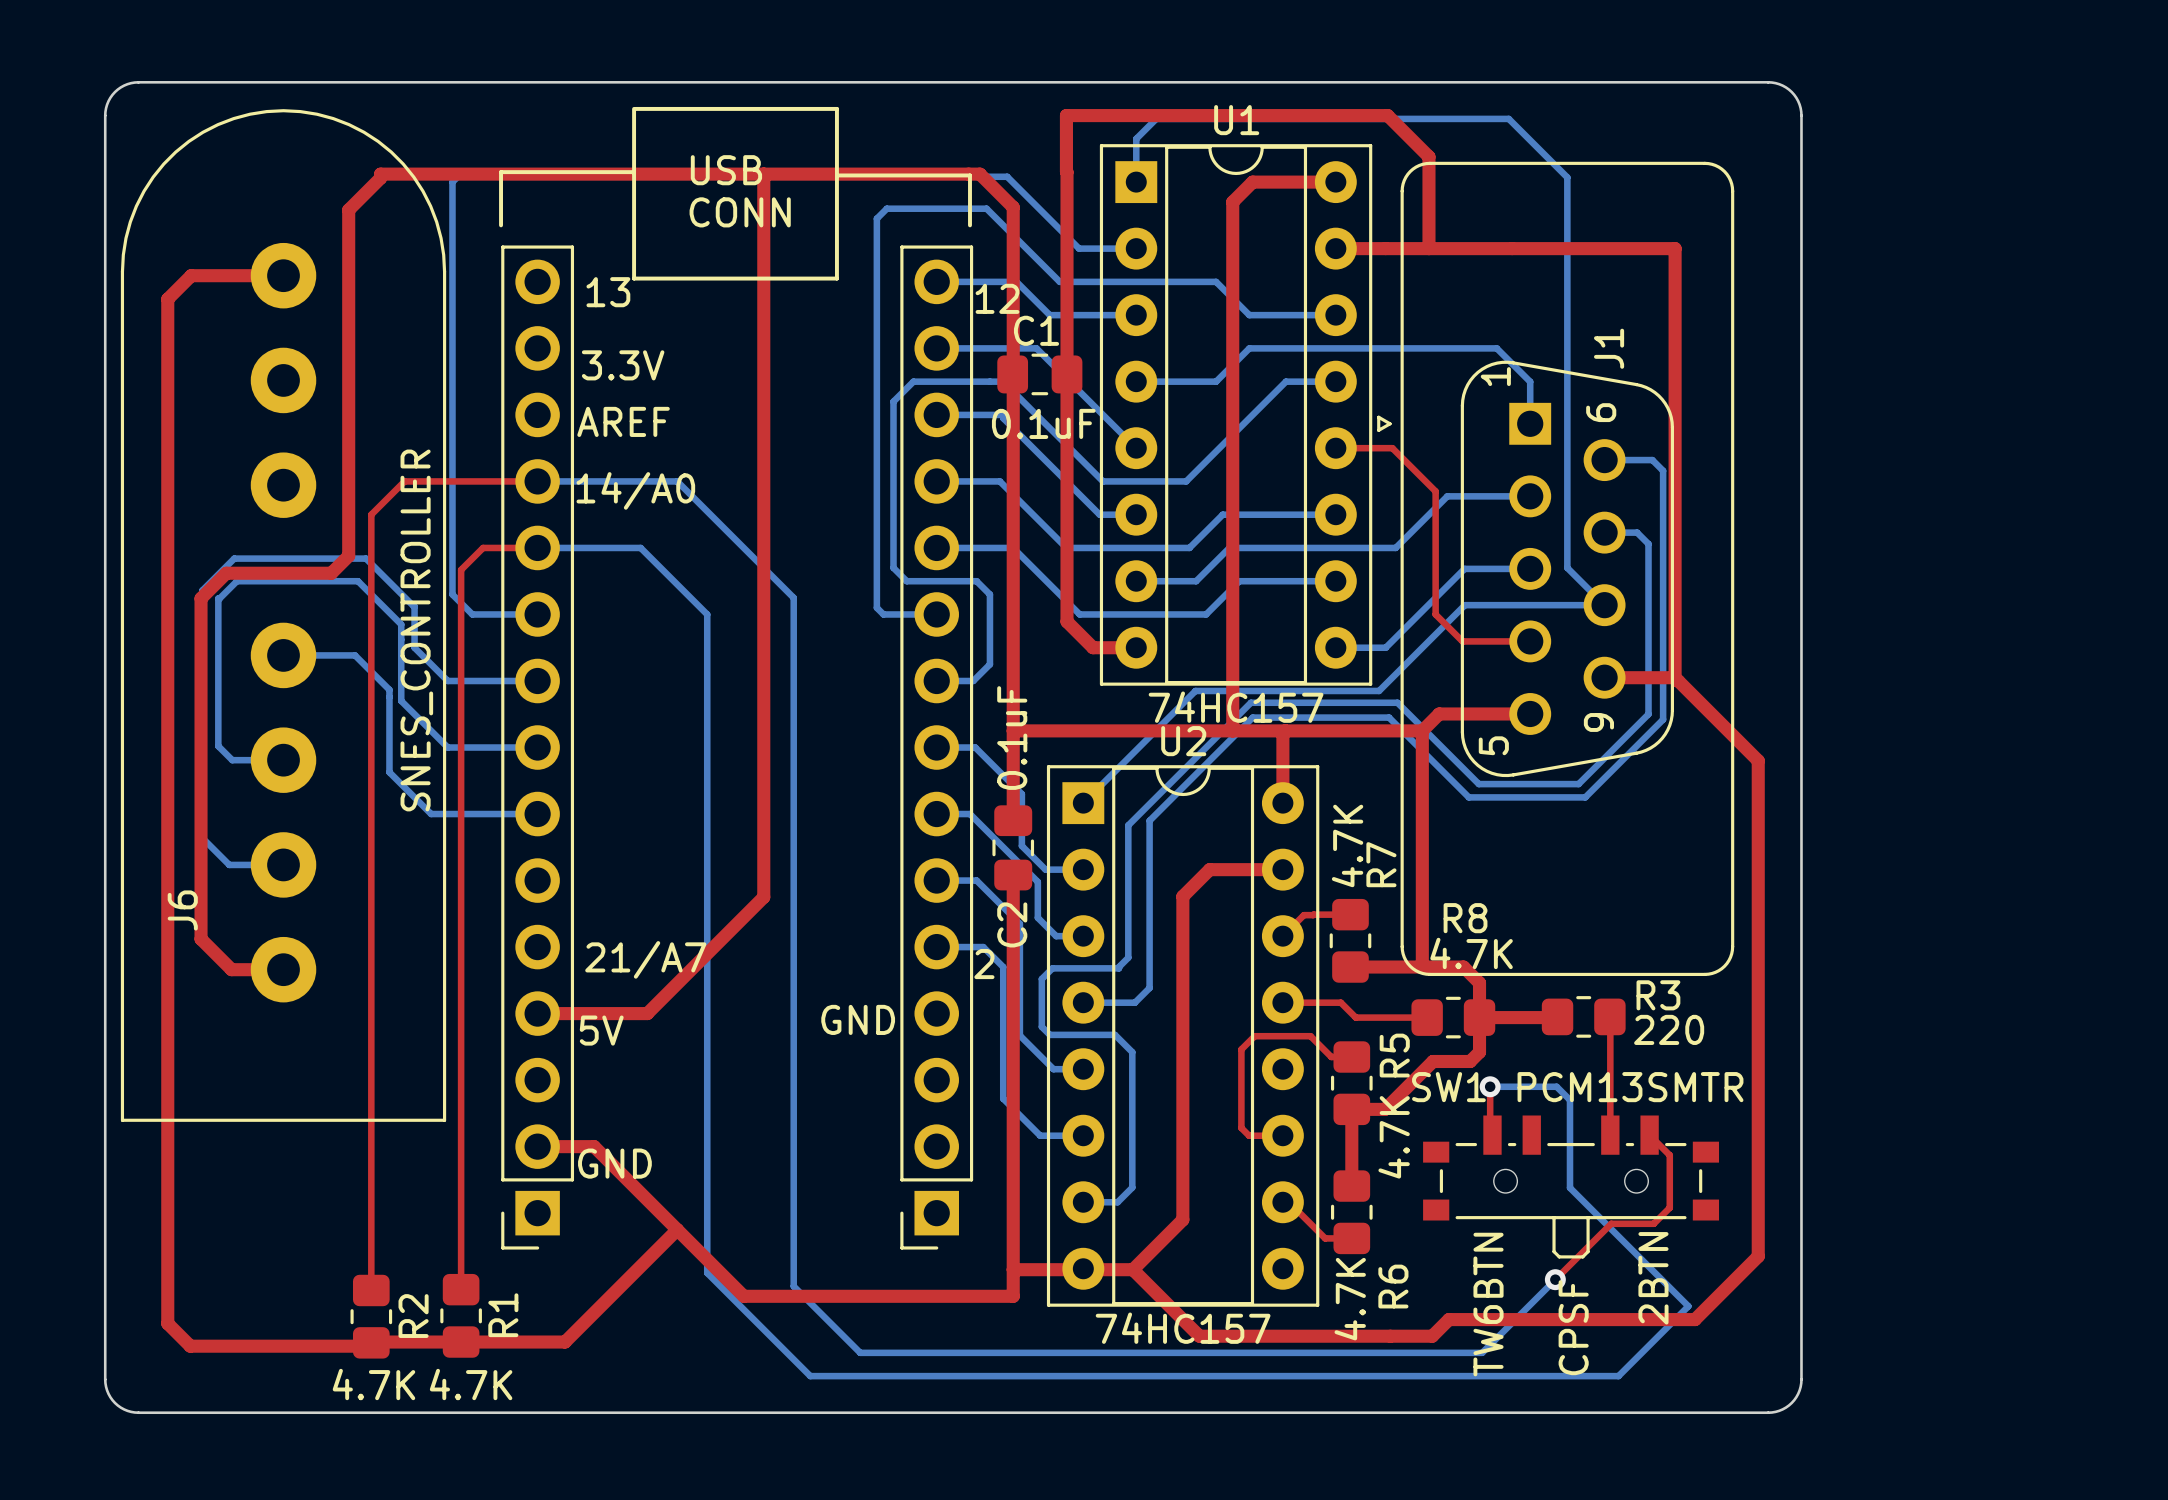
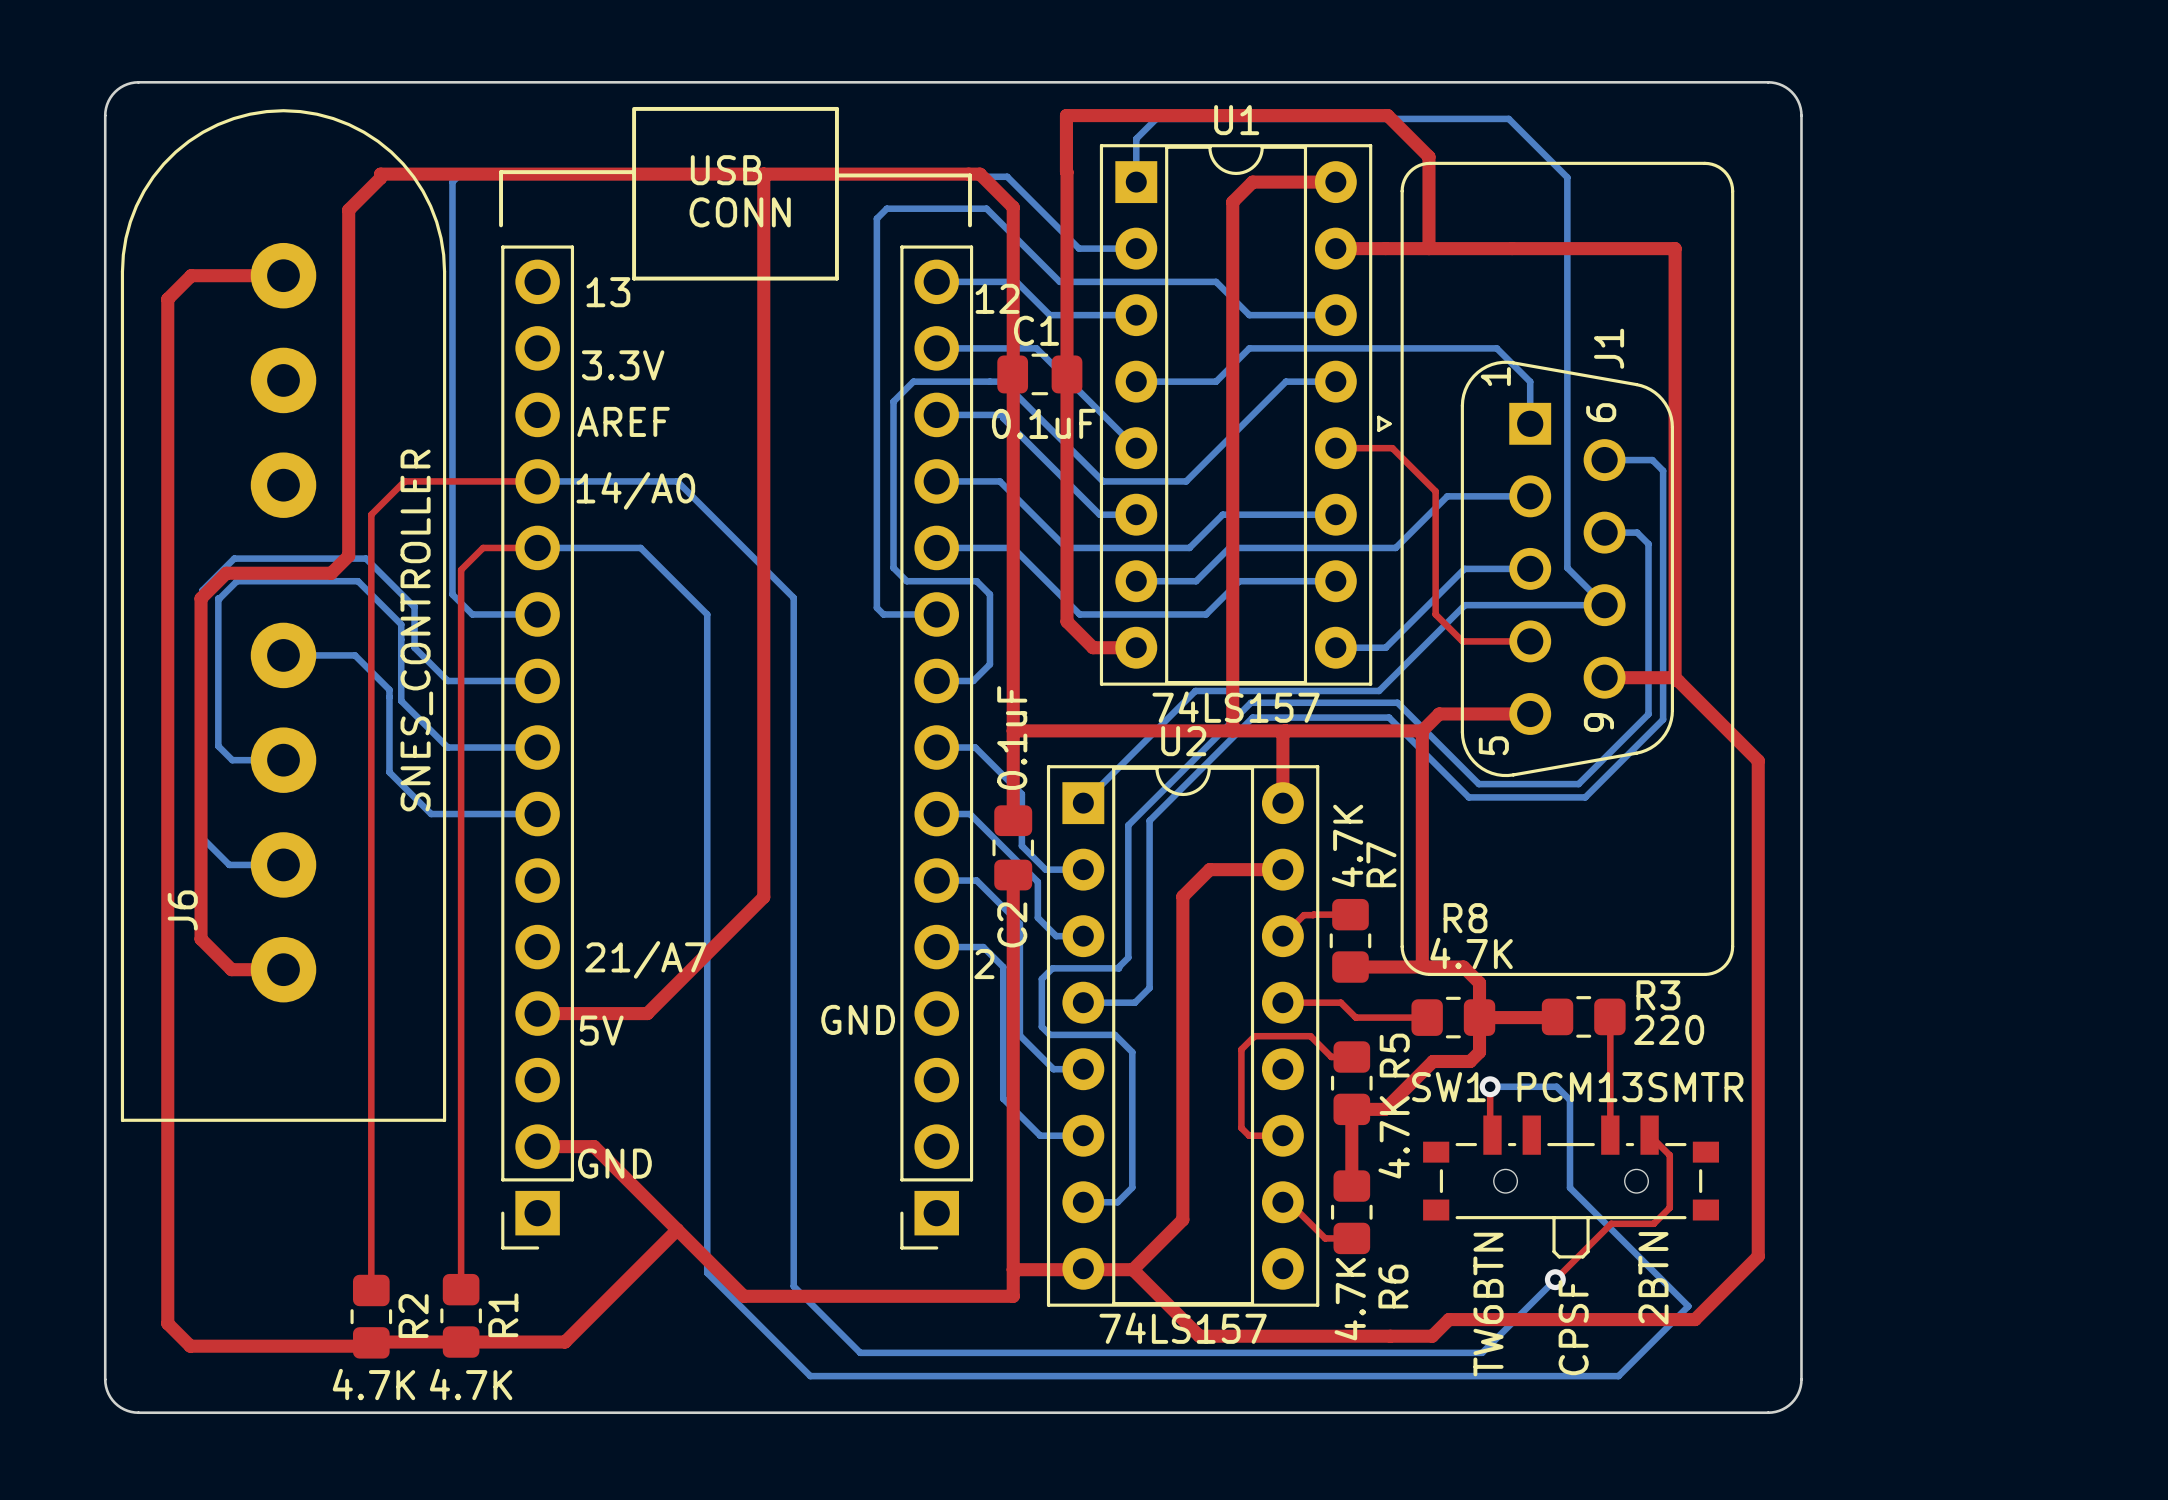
U1 value: 74HC157 (1236, 707) -> 74LS157 (1236, 707)
U2 value: 74HC157 (1183, 1328) -> 74LS157 (1183, 1328)

